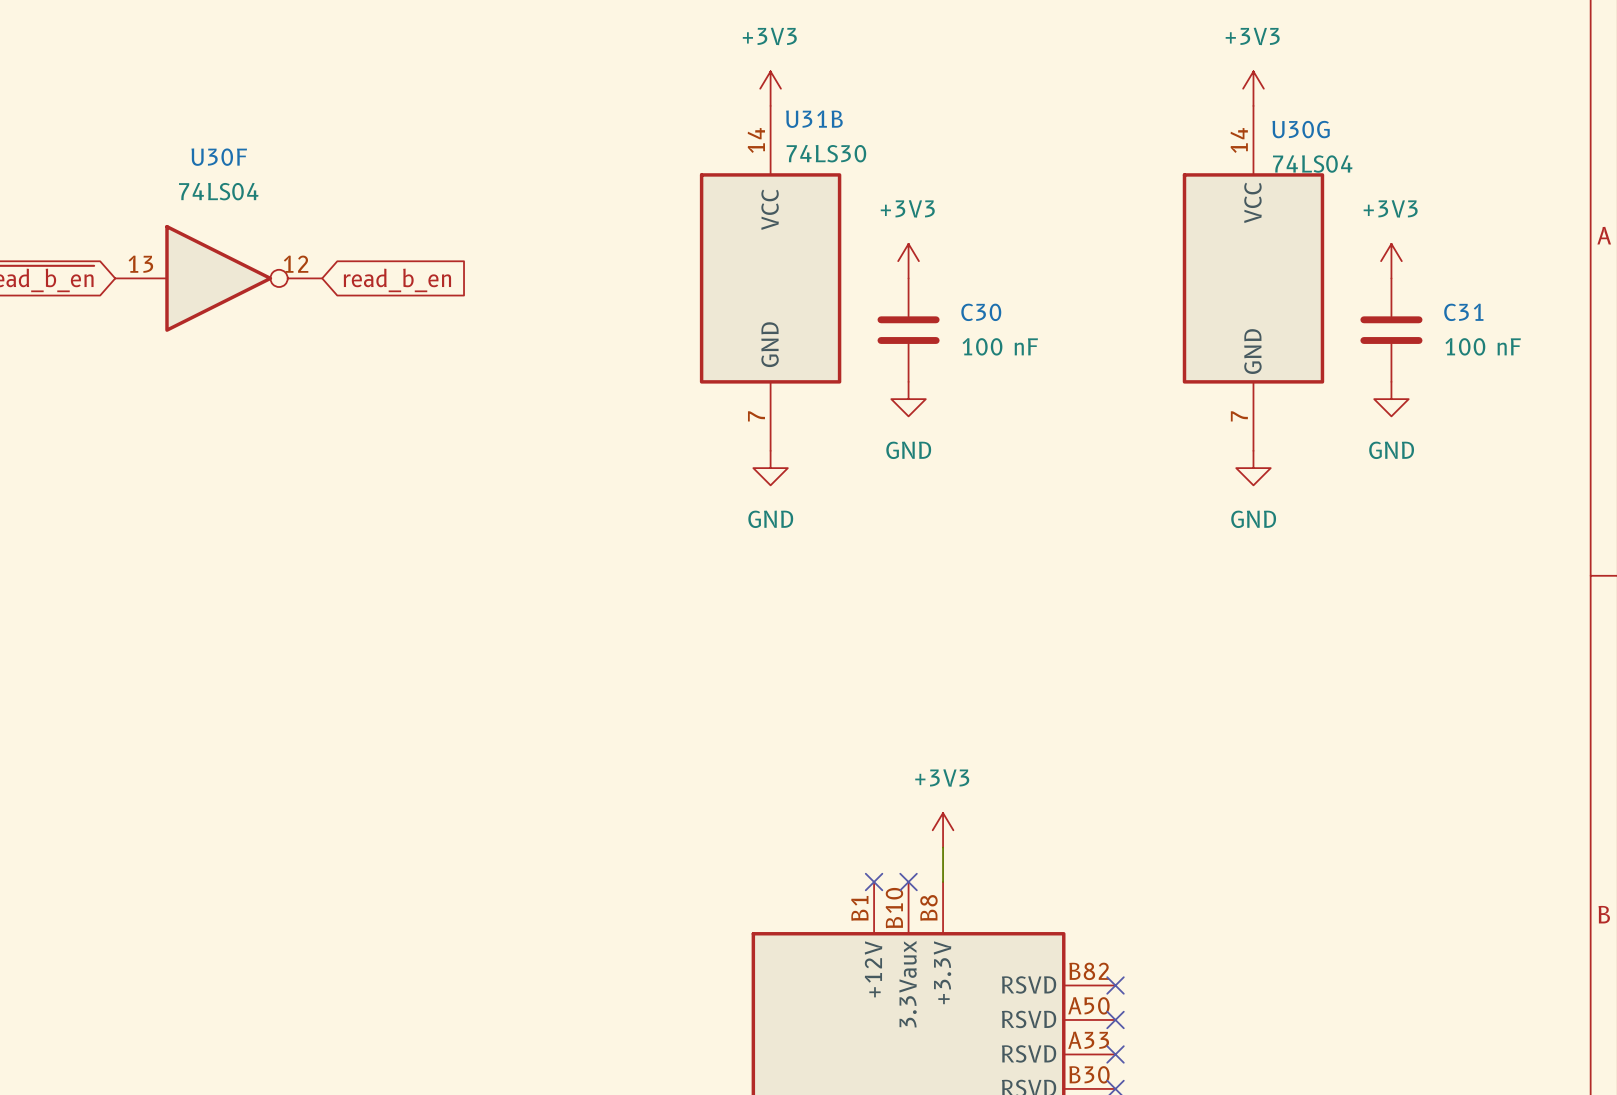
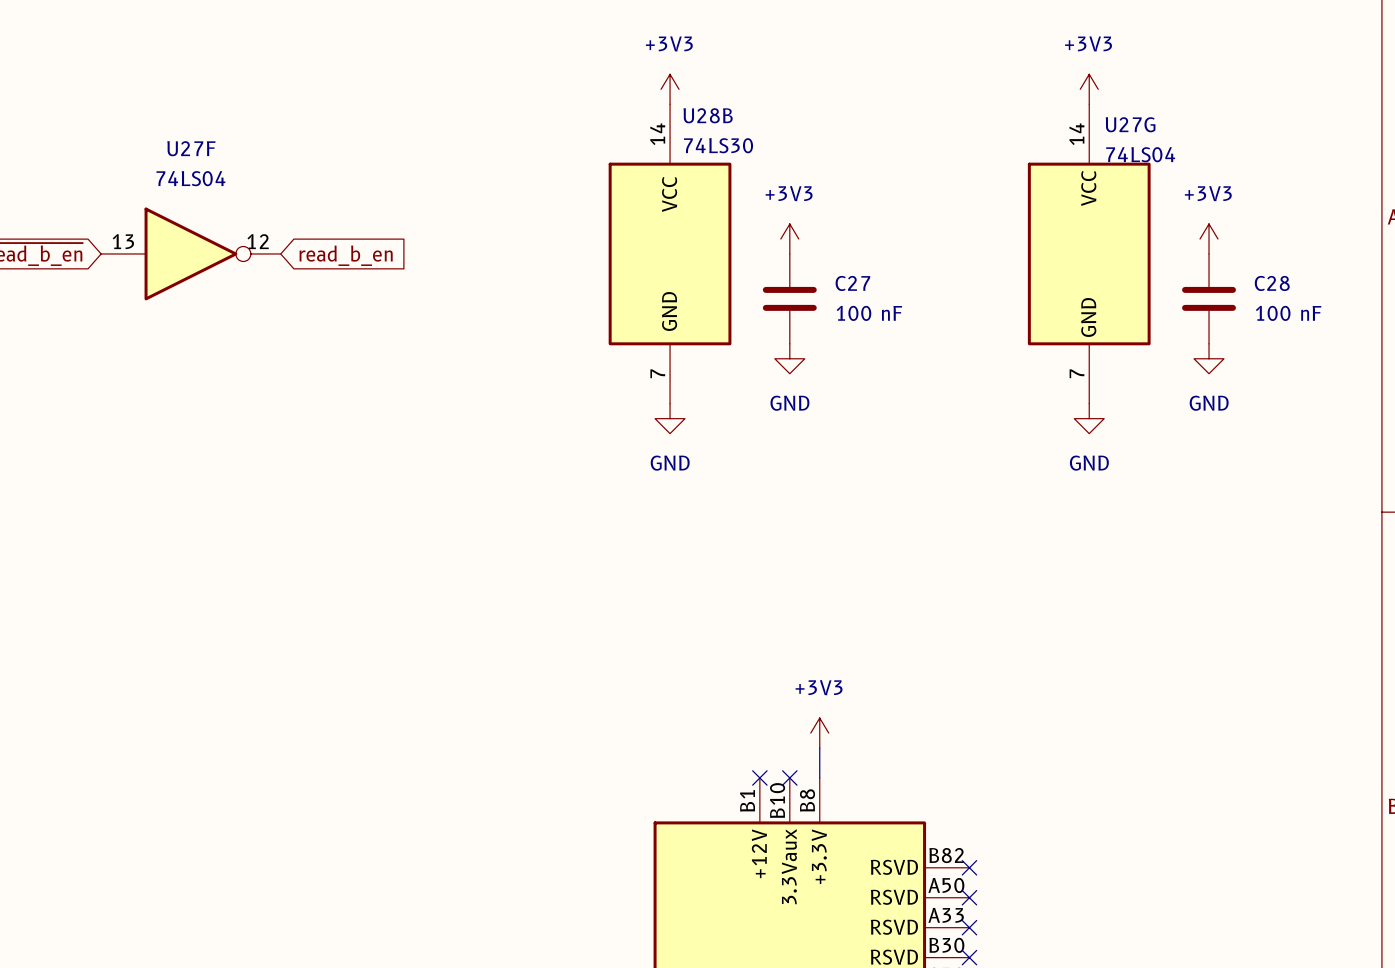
U31B name: U31B (814, 119) -> U28B (708, 115)
U30G name: U30G (1301, 129) -> U27G (1130, 124)
U30F name: U30F (219, 157) -> U27F (191, 148)
C30 name: C30 (981, 312) -> C27 (852, 283)
C31 name: C31 (1463, 312) -> C28 (1272, 283)

